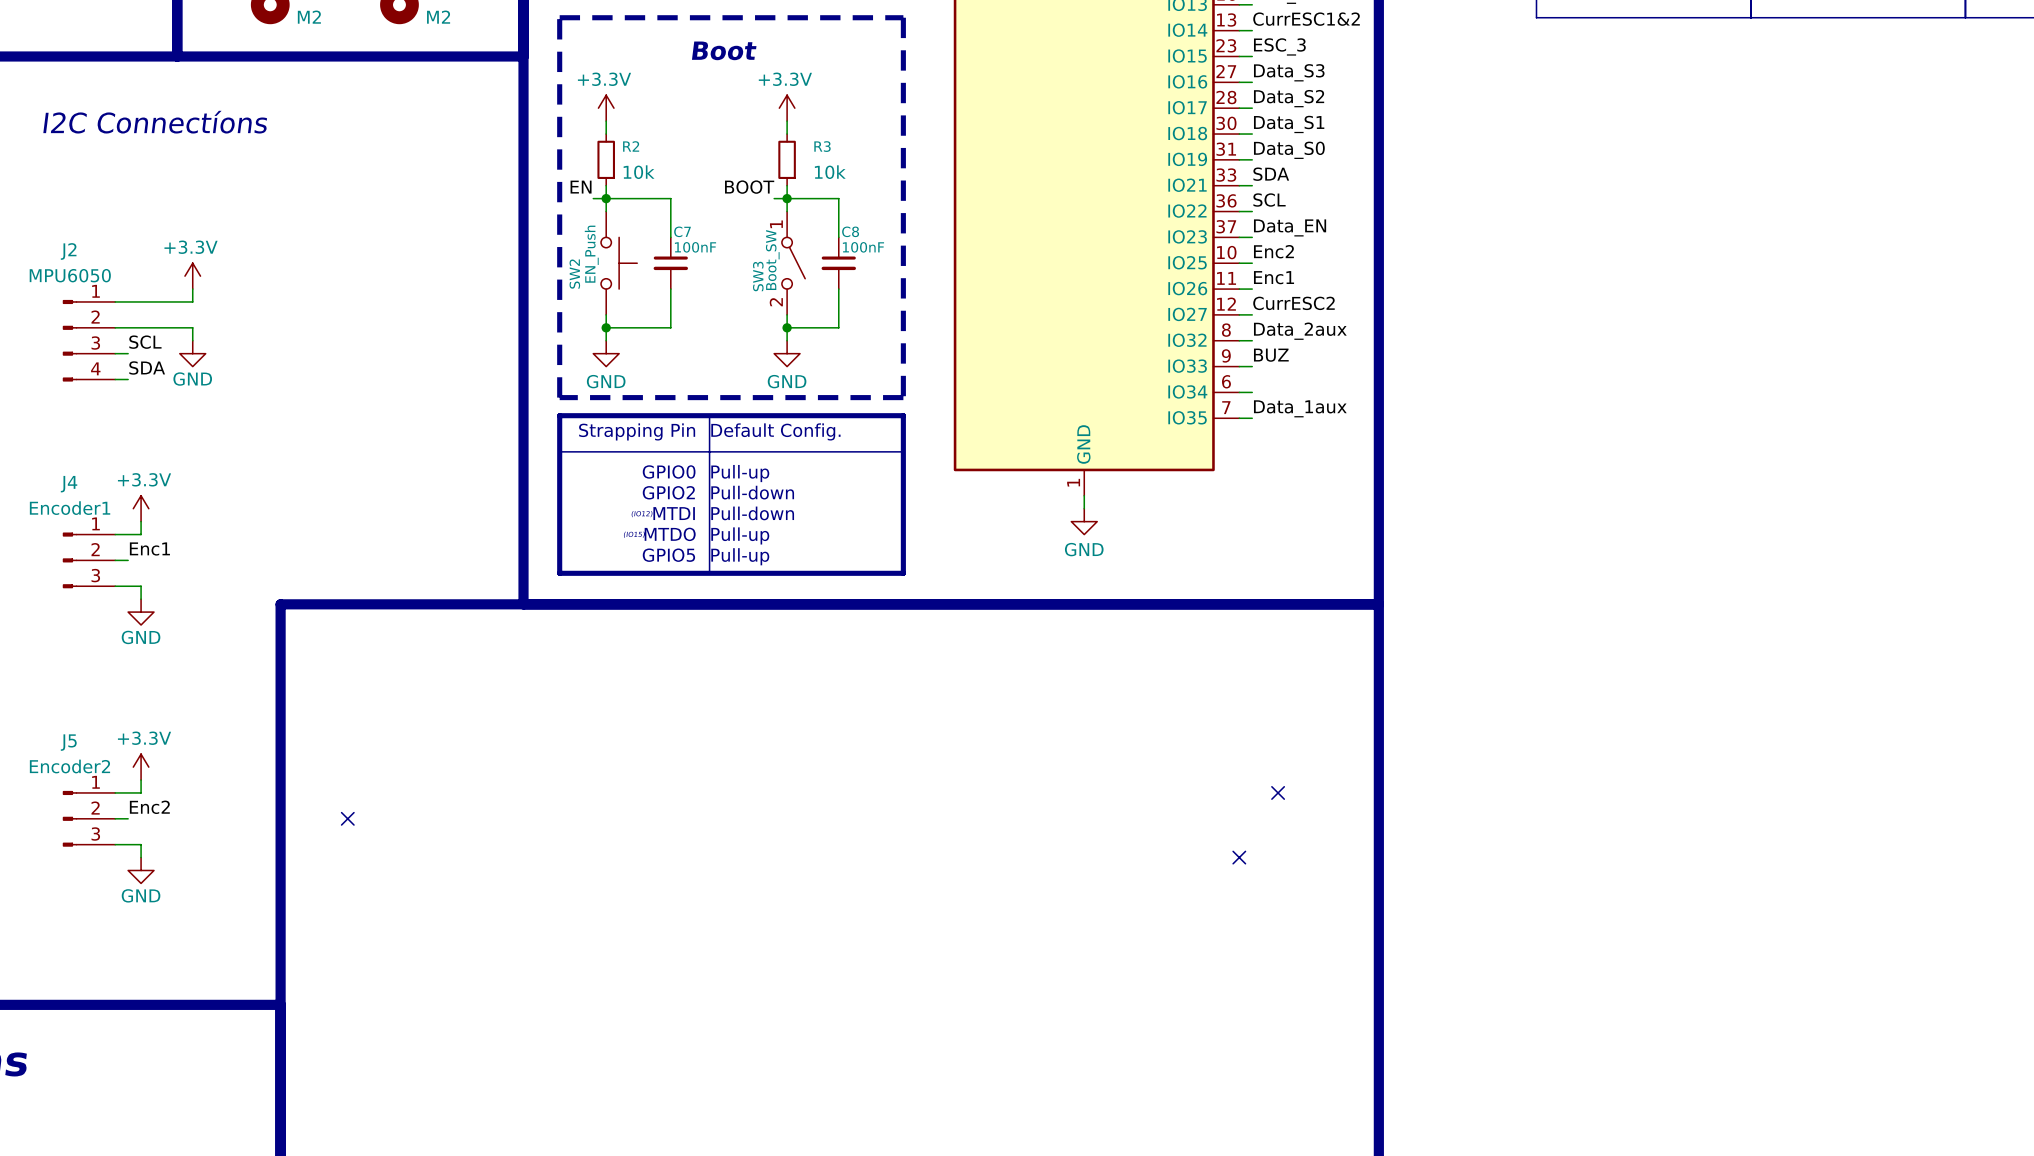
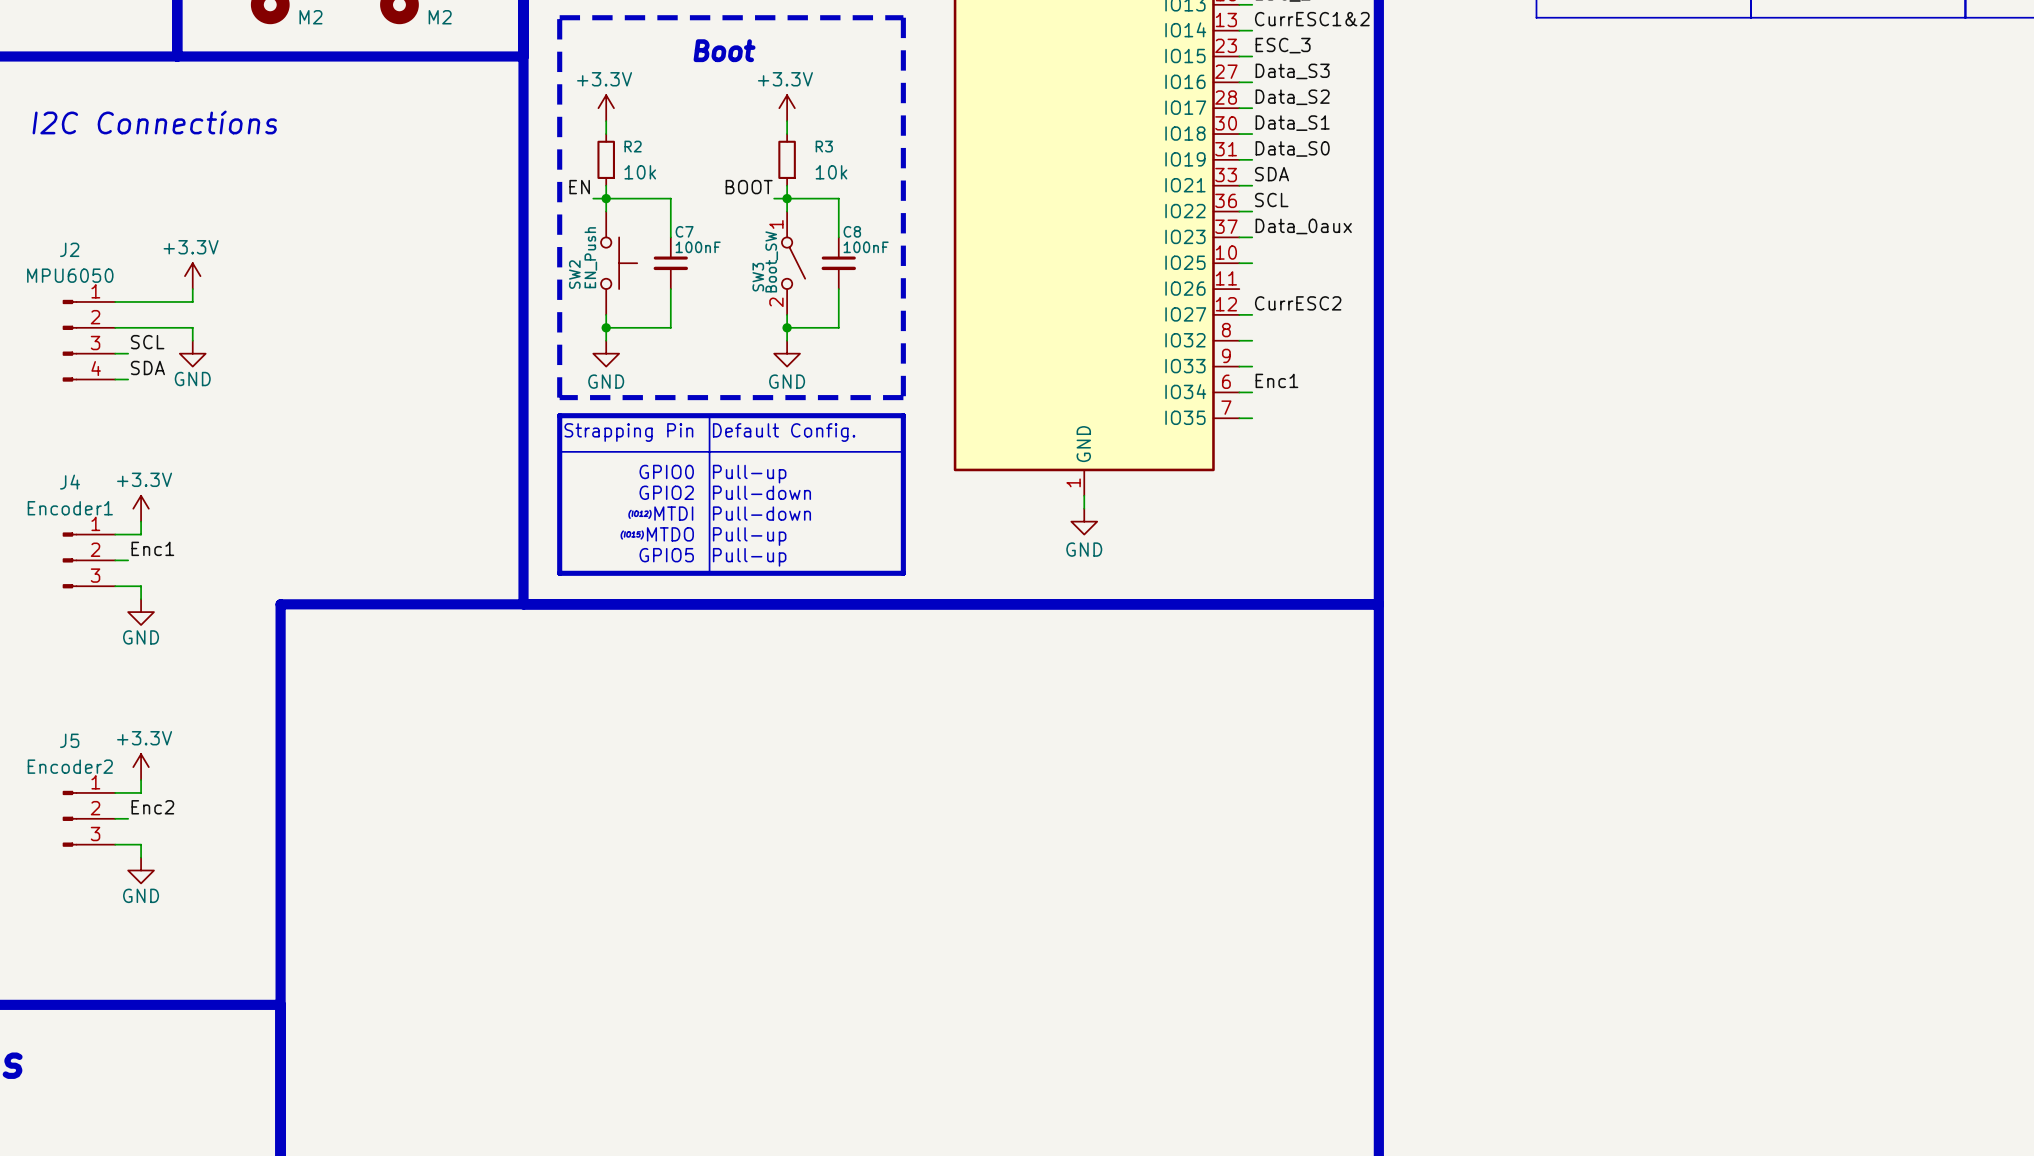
label: Data_EN (1290, 227) -> Data_0aux (1303, 226)
label: Enc2 (1273, 251) -> none
label position: Enc1 (1274, 277) -> Enc1 (1276, 380)
wire: (1239, 289) (1252, 289) -> none
label: Data_2aux (1300, 331) -> none
label: BUZ (1271, 355) -> none
label: Data_1aux (1300, 408) -> none
no-connect mark: (1278, 792) -> none
no-connect mark: (347, 818) -> none
no-connect mark: (1239, 857) -> none

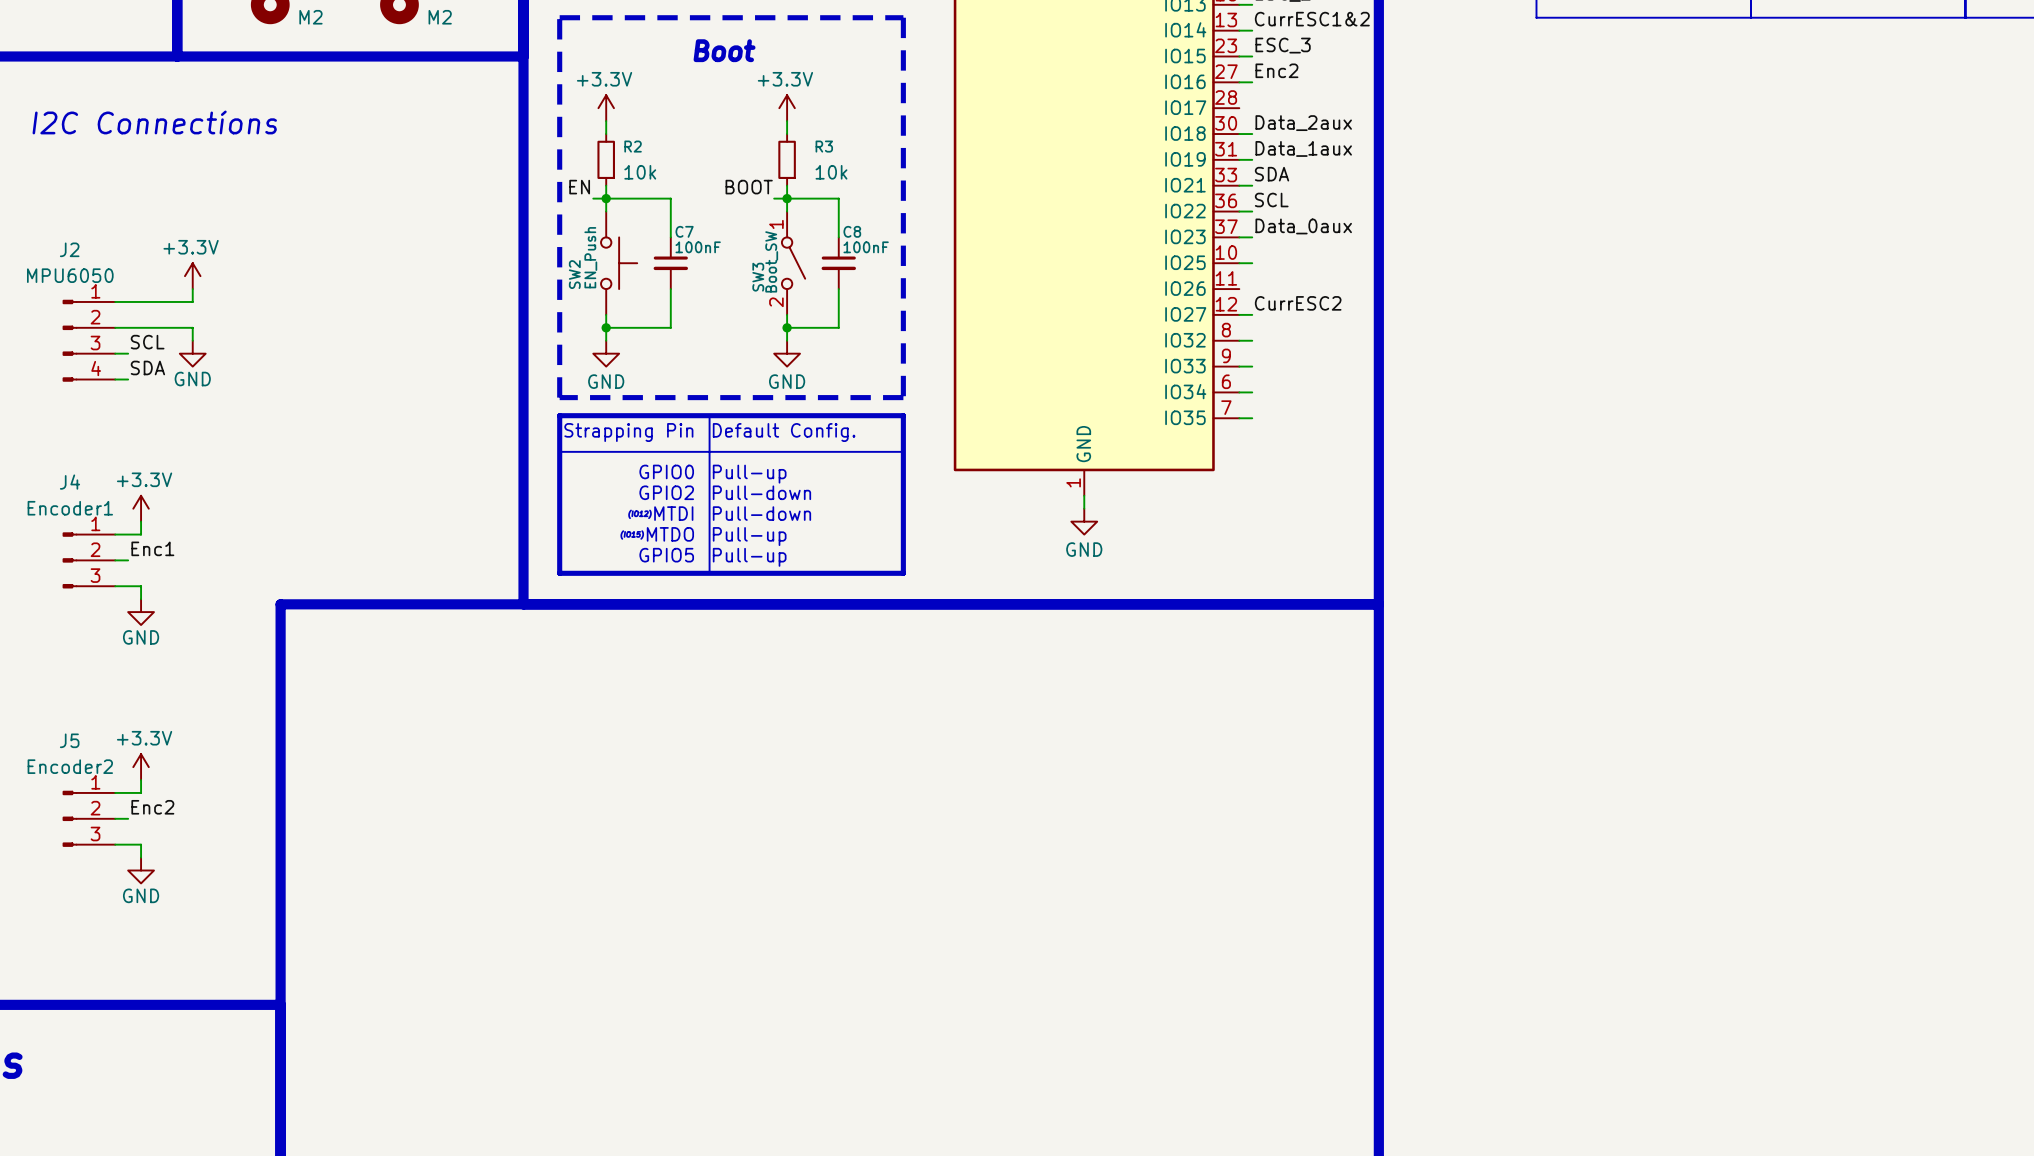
label: Data_S3 (1292, 71) -> Enc2 (1276, 70)
label: Data_S2 (1292, 97) -> none
wire: (1239, 108) (1252, 108) -> none
label: Data_S1 (1292, 123) -> Data_2aux (1303, 123)
label: Data_S0 (1292, 148) -> Data_1aux (1303, 148)
label: Enc1 (1276, 380) -> none

